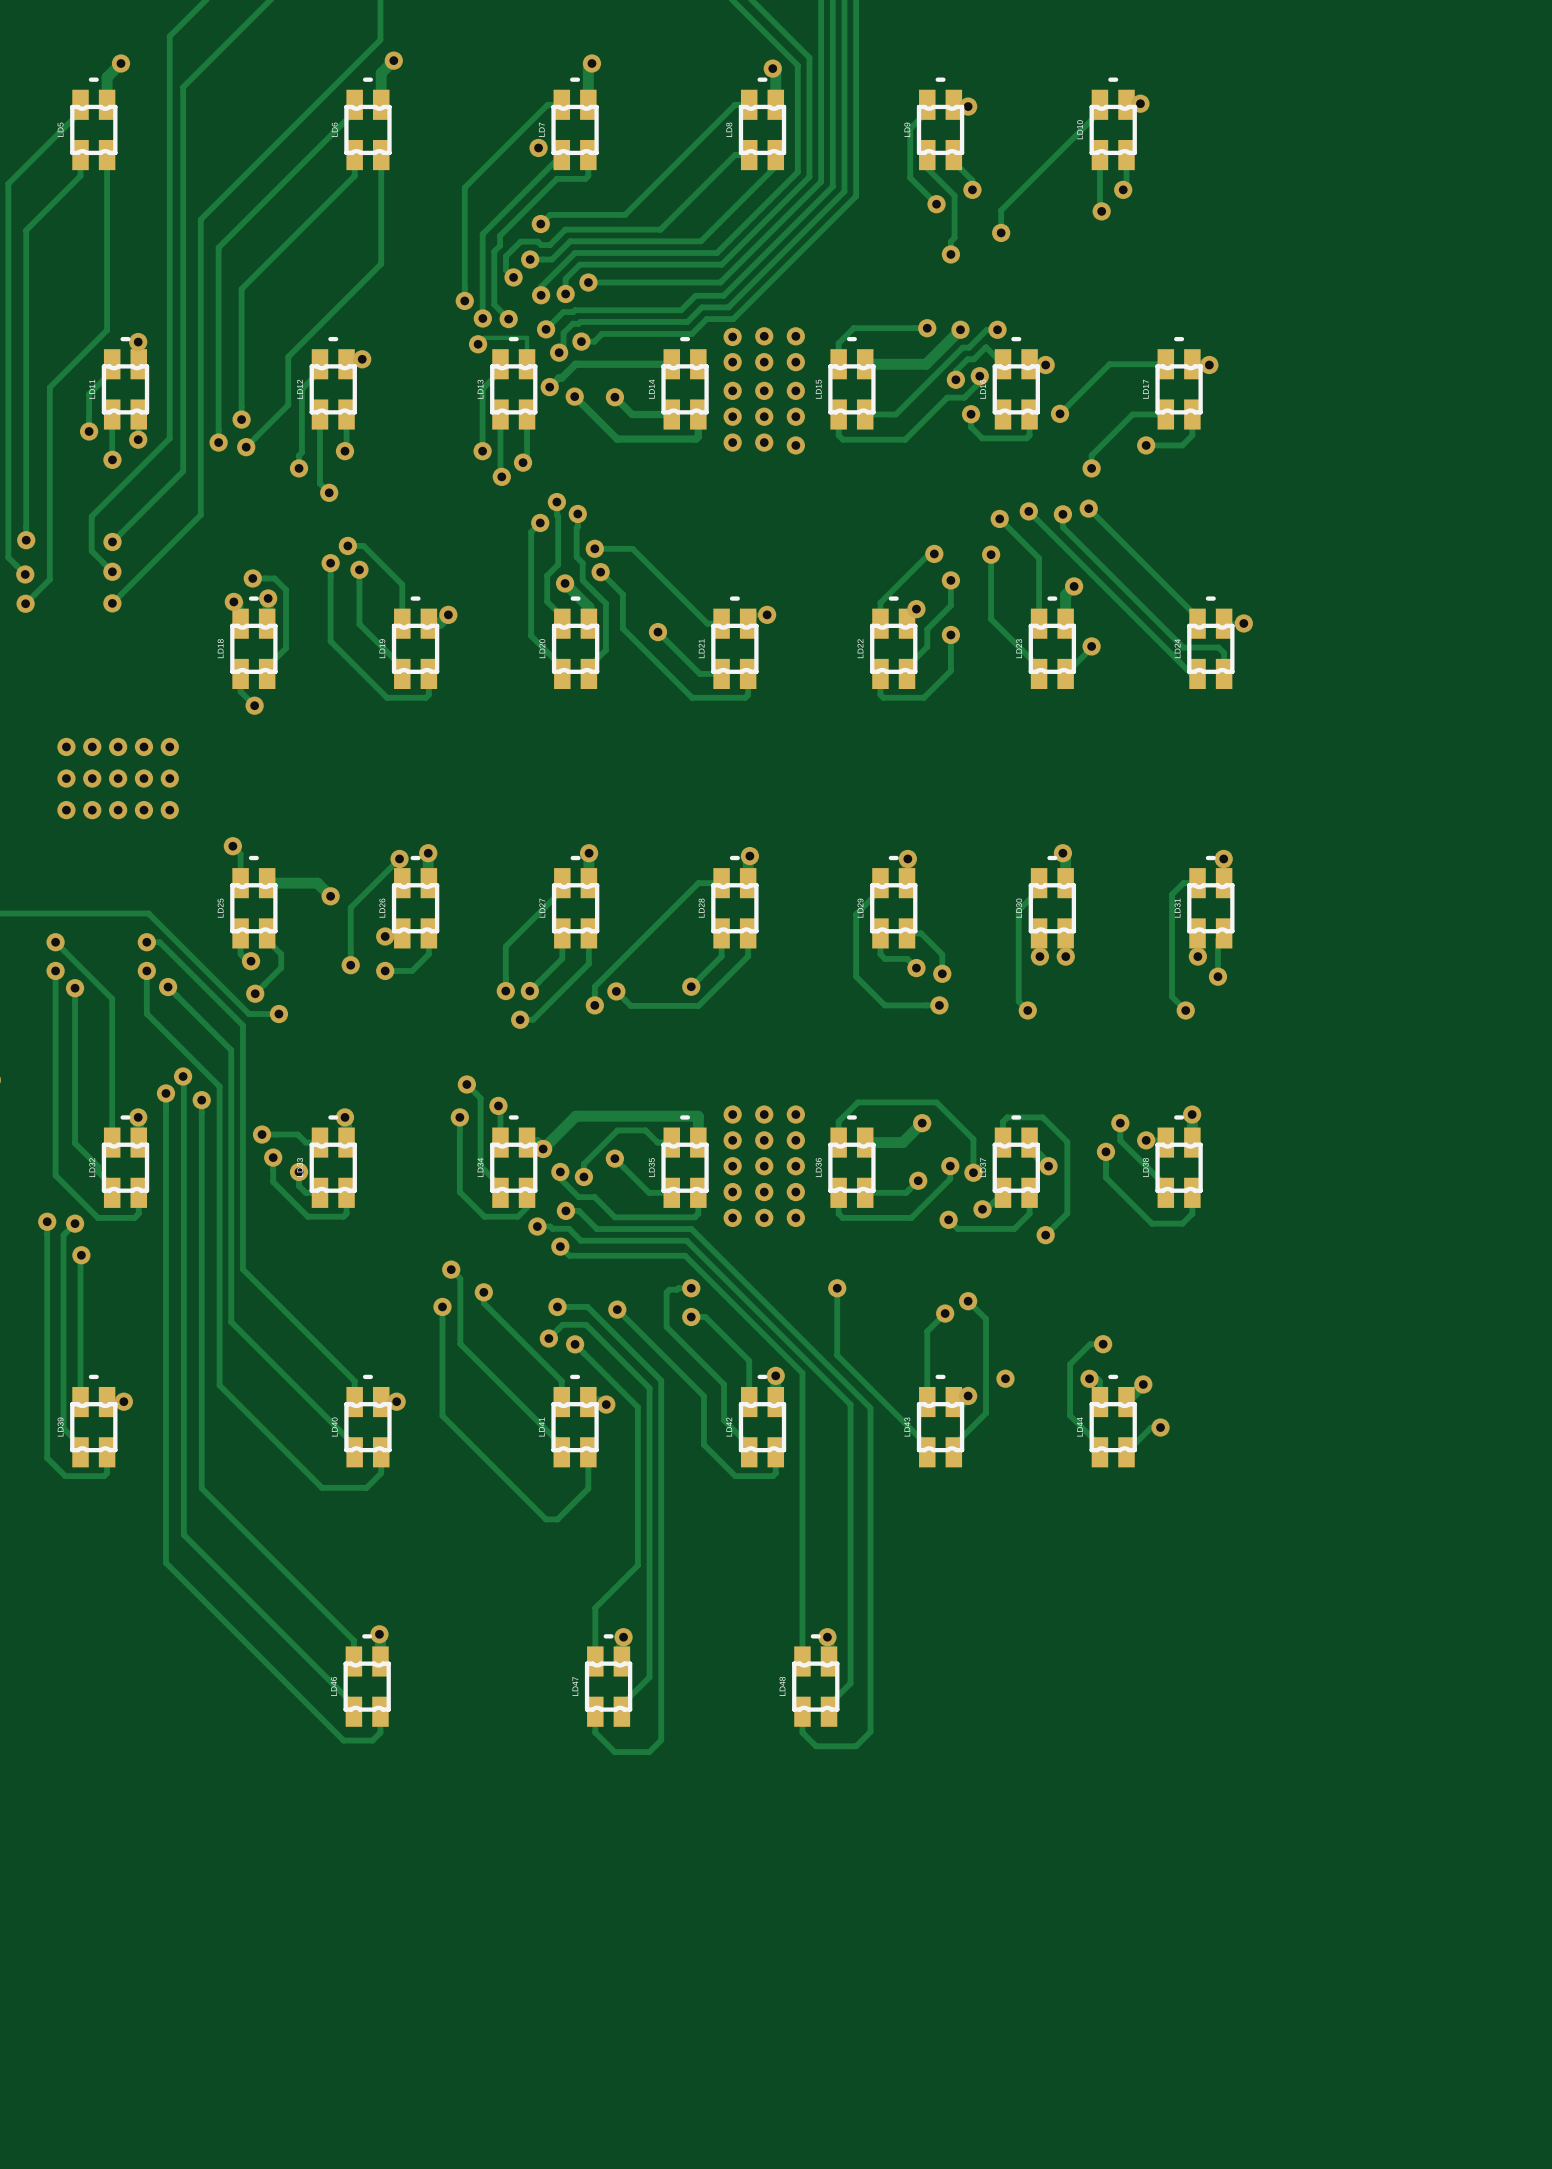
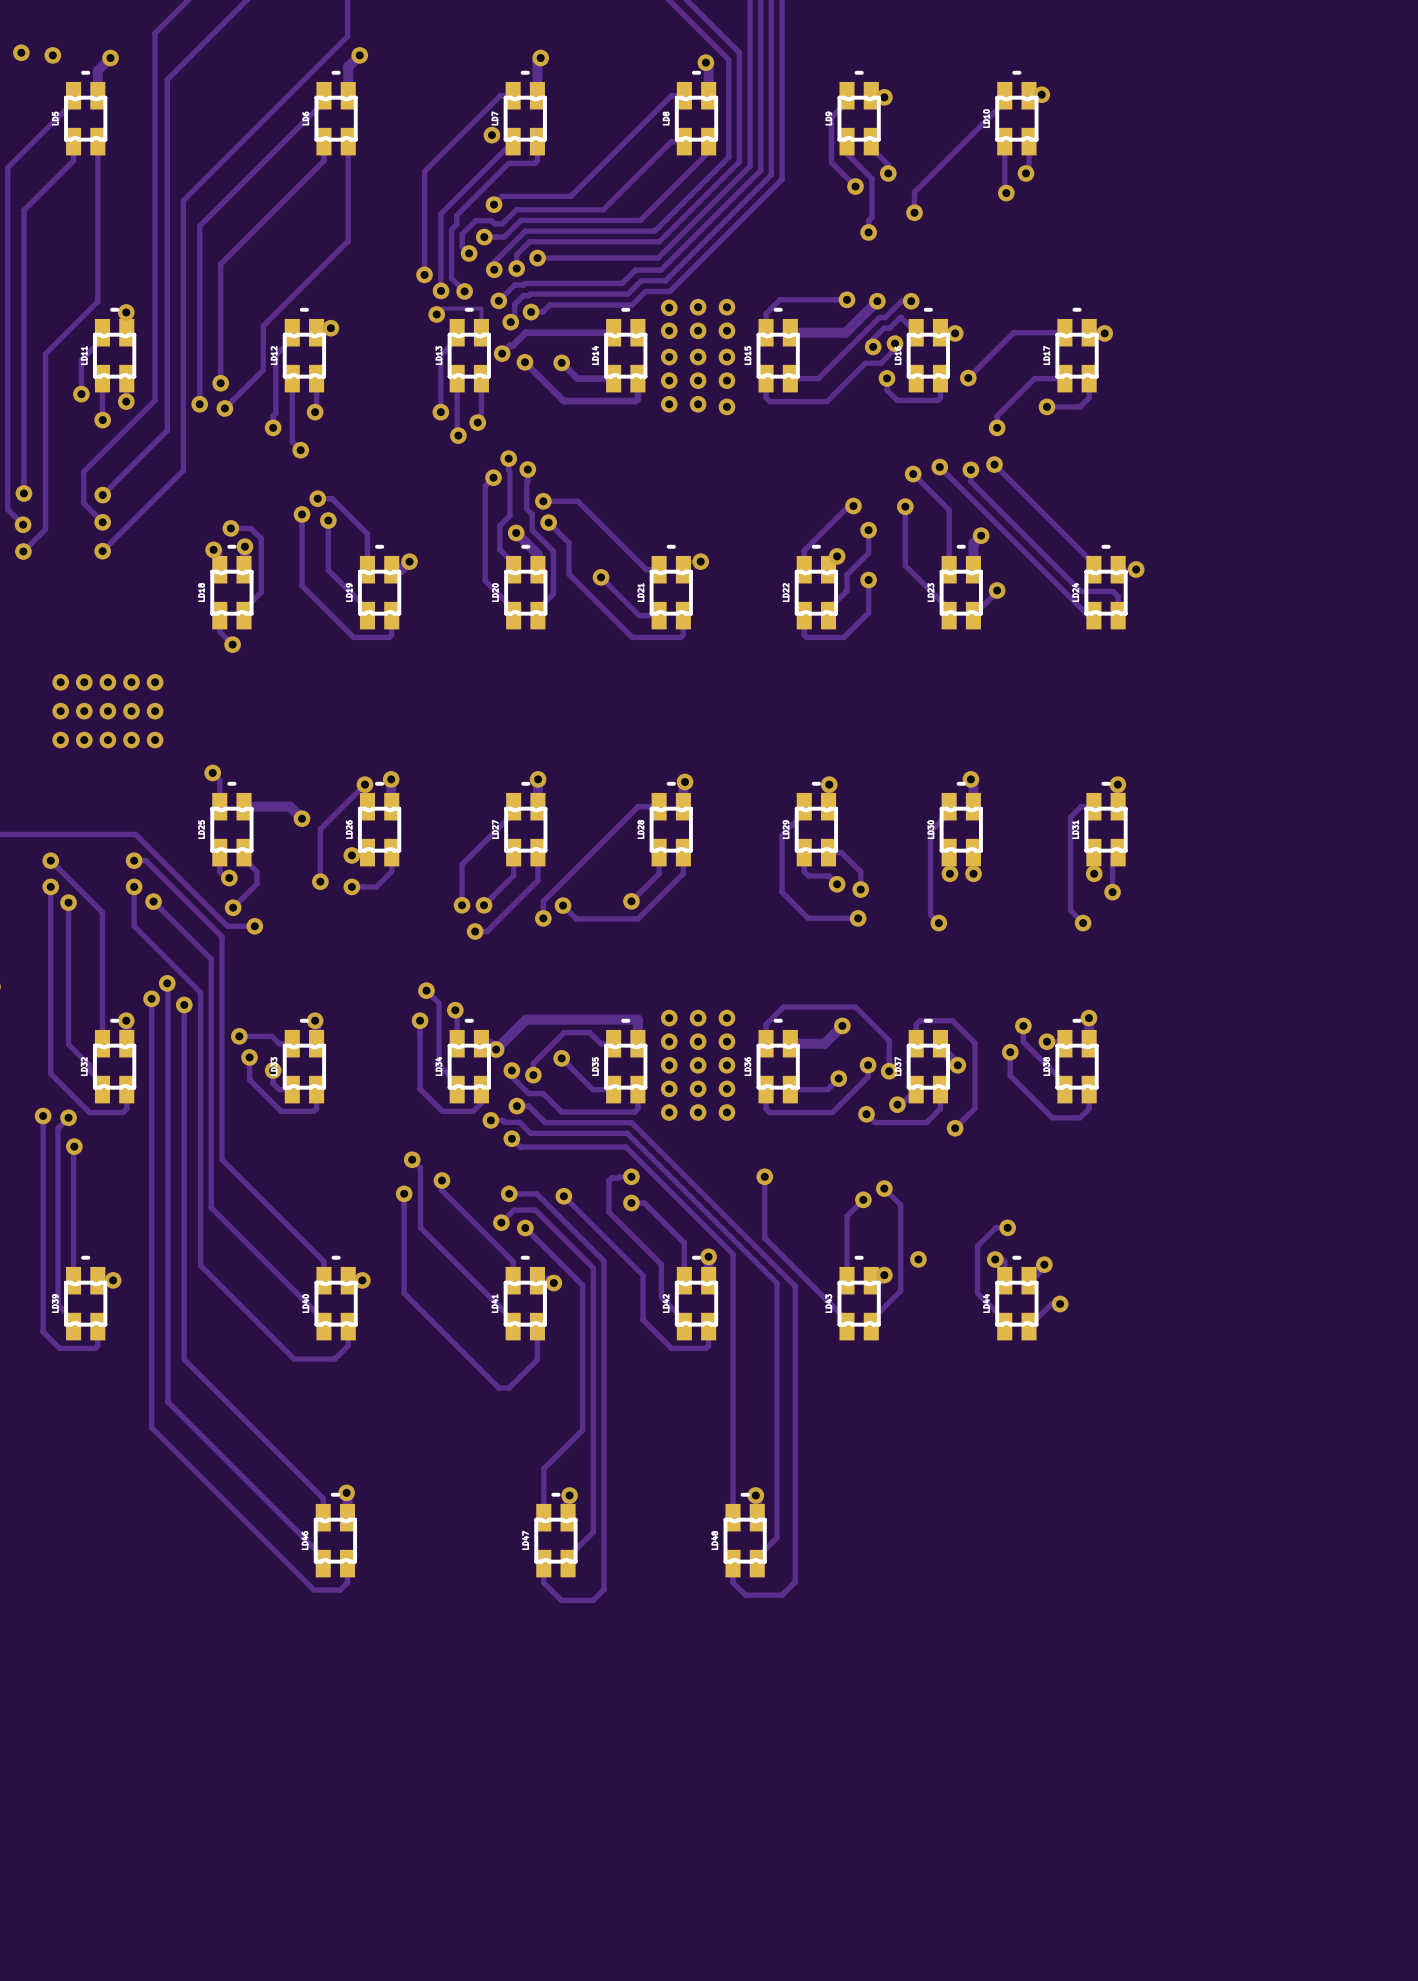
via: none -> (21, 52)
via: none -> (52, 55)

